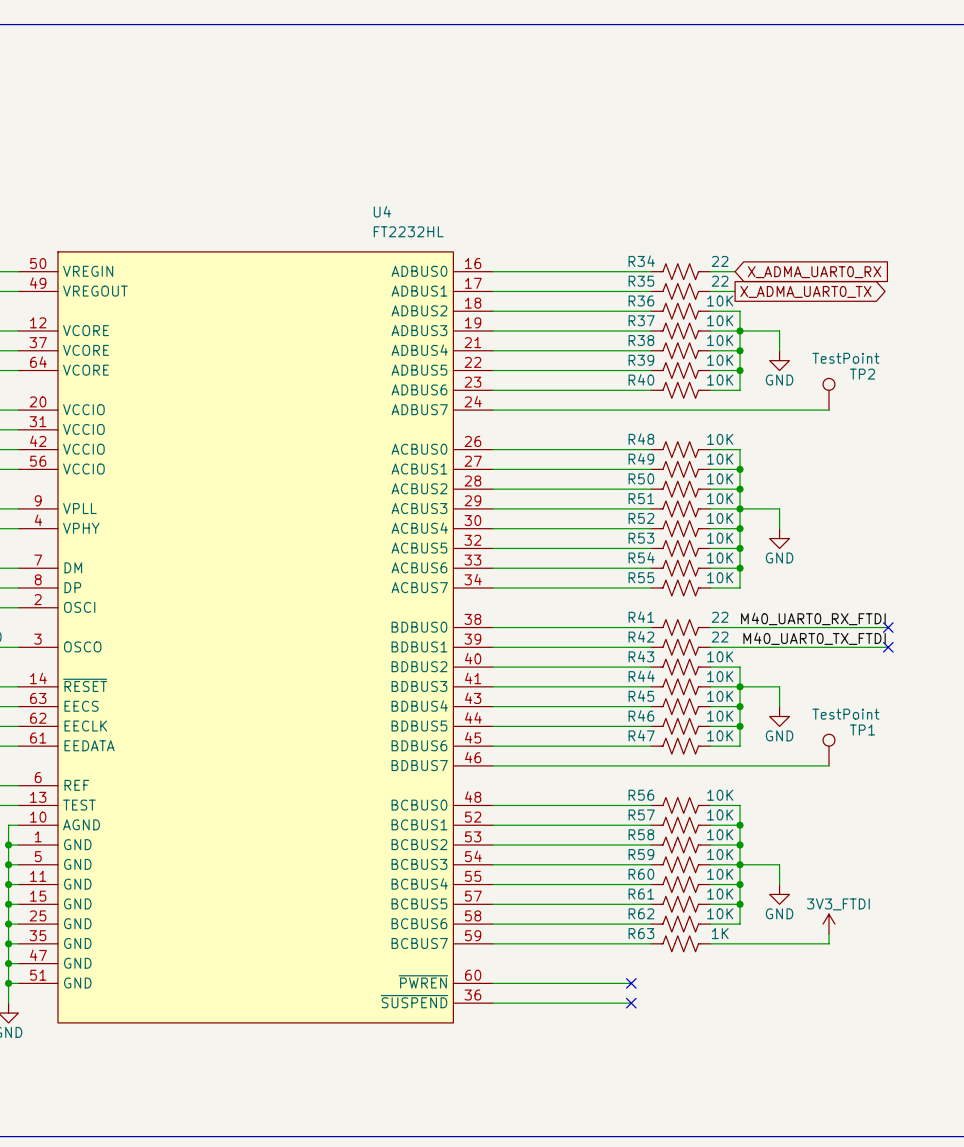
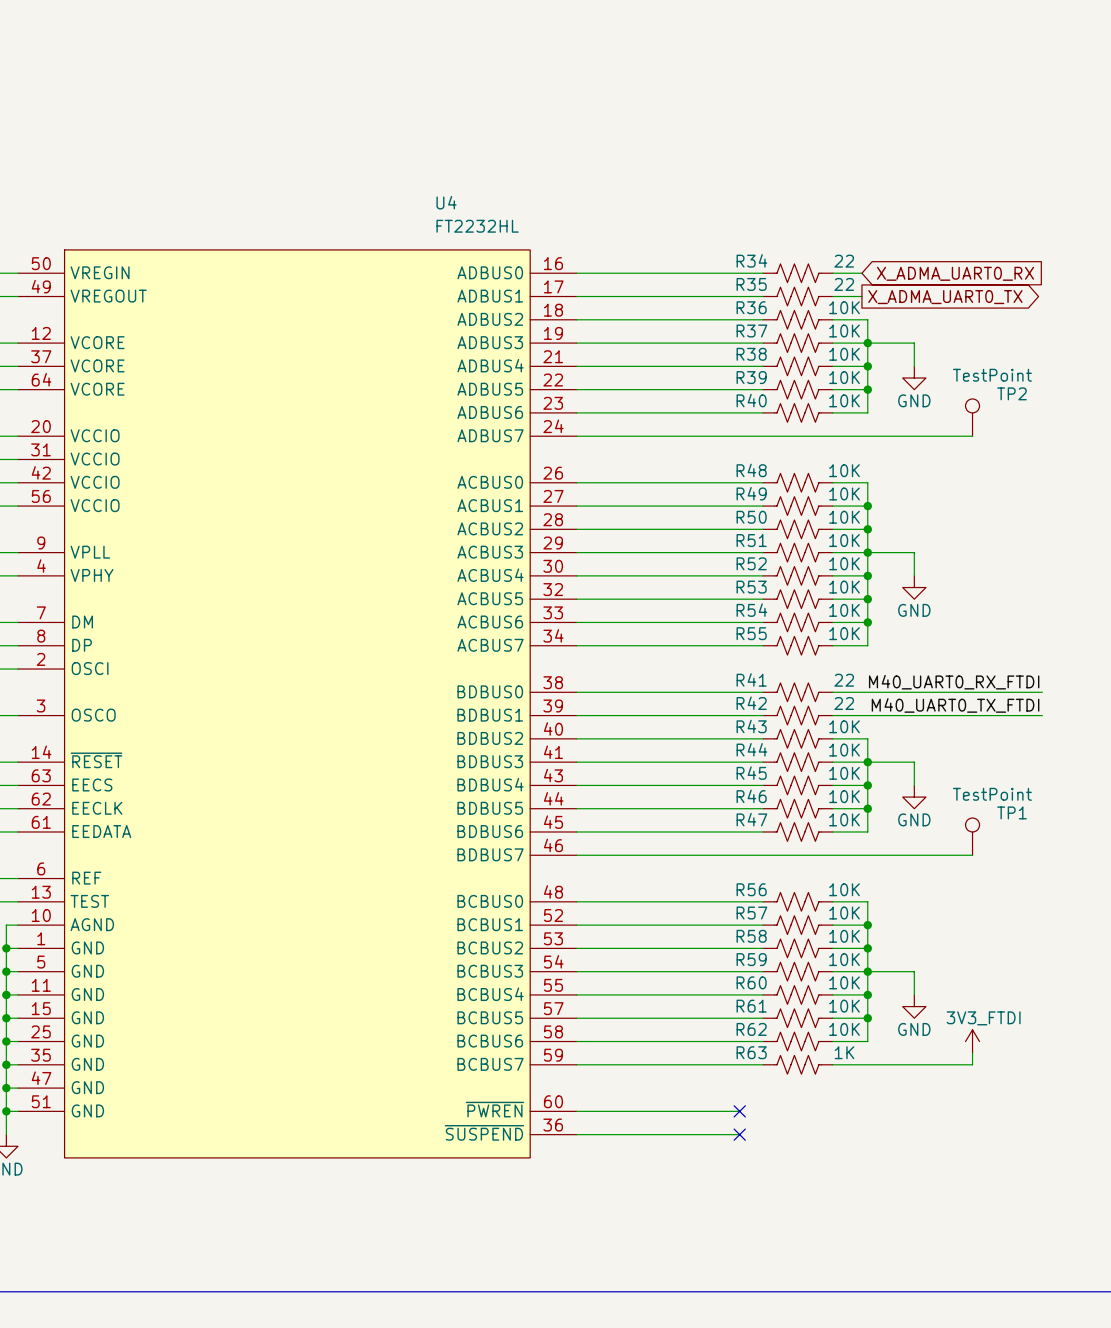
no-connect mark: (888, 627) -> none
no-connect mark: (888, 647) -> none

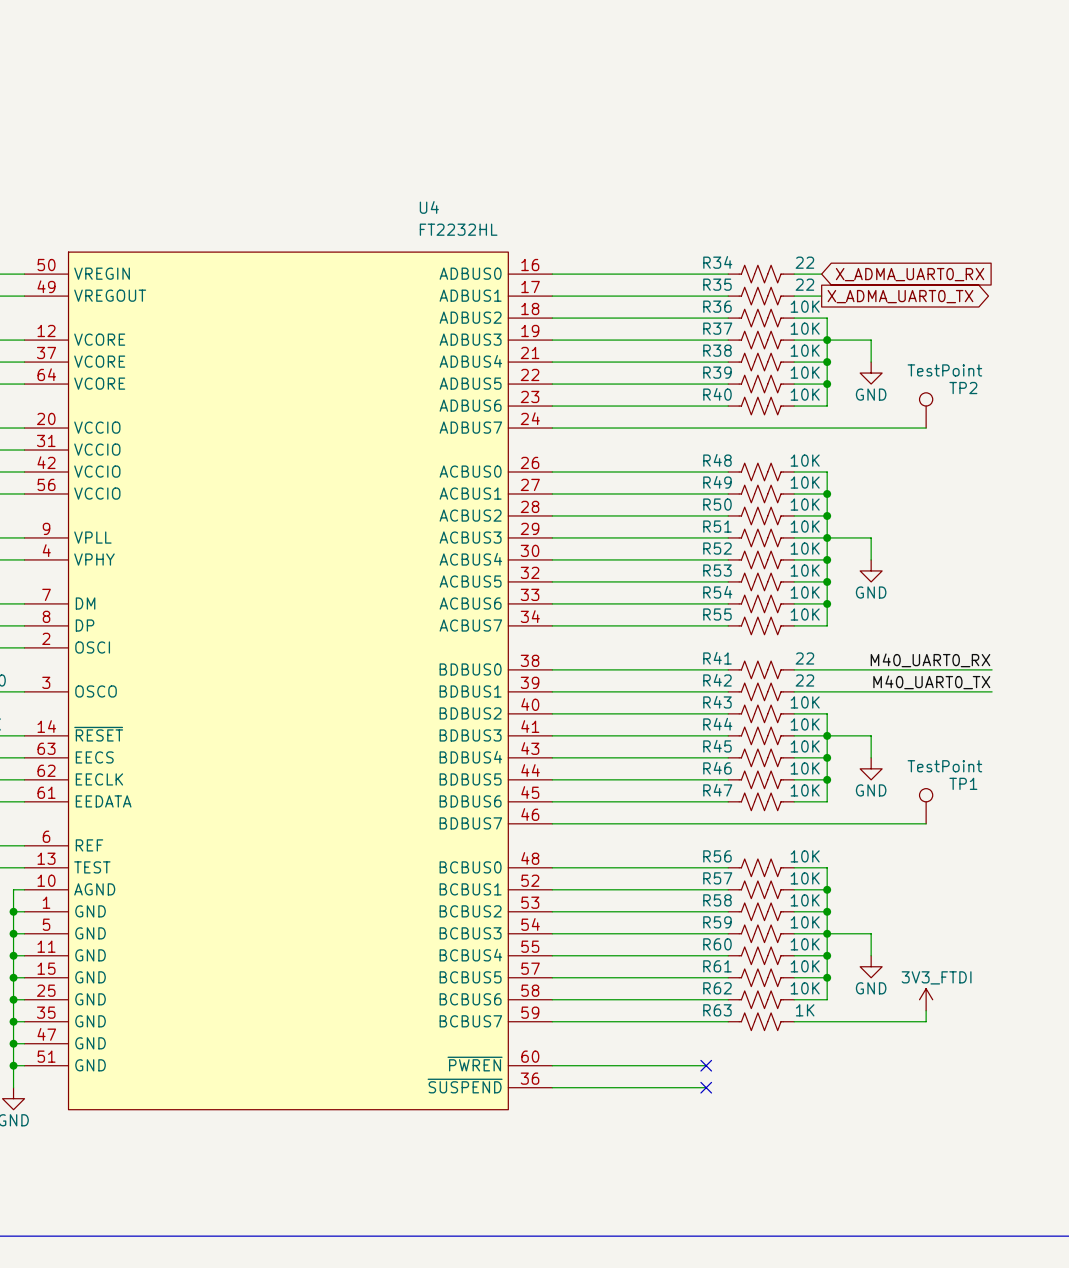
label: M40_UART0_RX_FTDI (954, 682) -> M40_UART0_RX (930, 660)
label: M40_UART0_TX_FTDI (955, 705) -> M40_UART0_TX (931, 682)

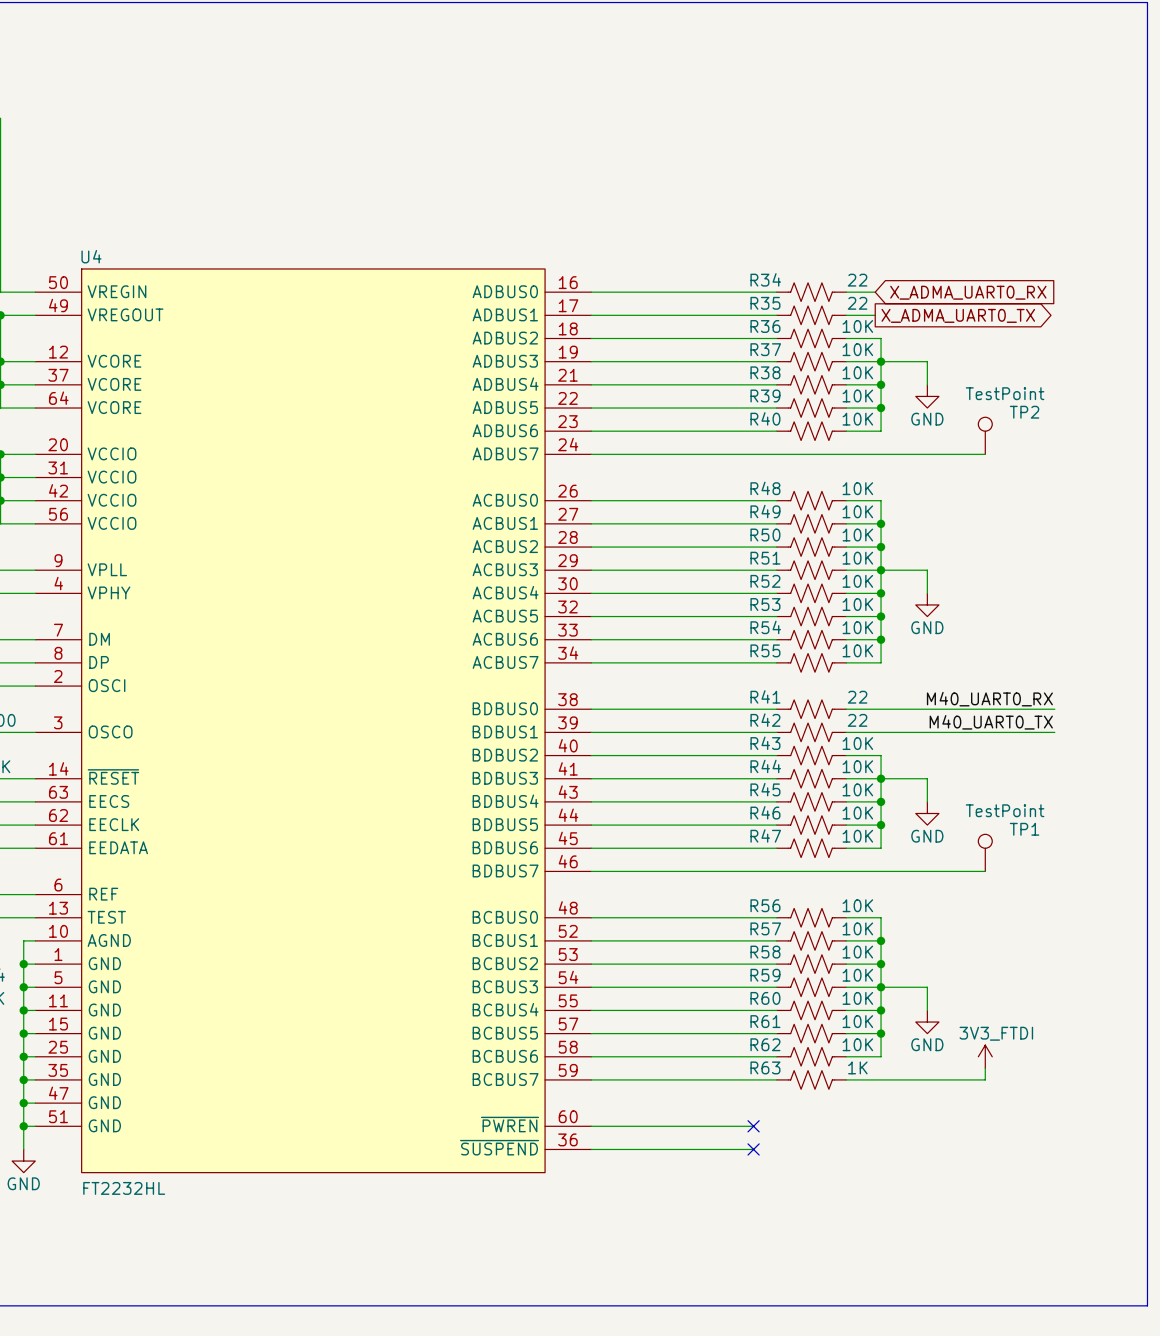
U4 name position: U4 (429, 207) -> U4 (91, 256)
U4 value position: FT2232HL (458, 229) -> FT2232HL (124, 1188)

